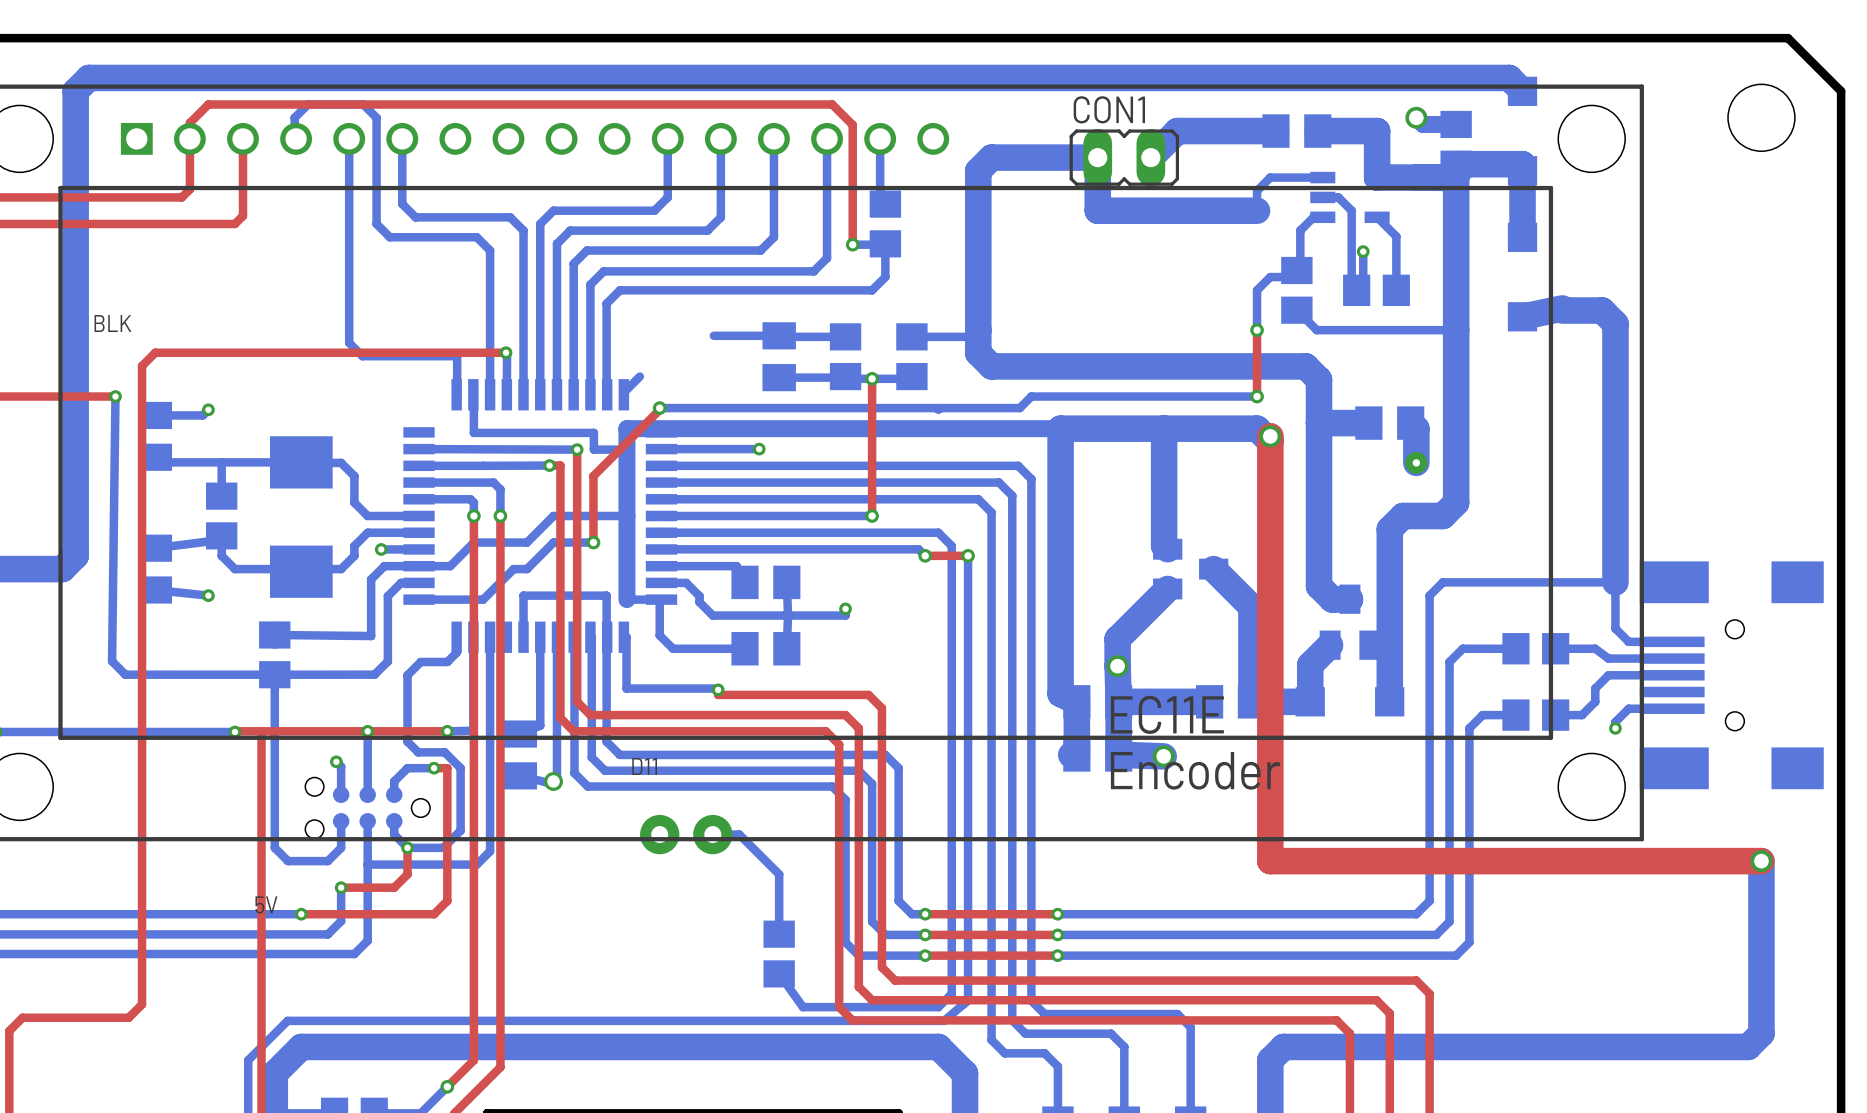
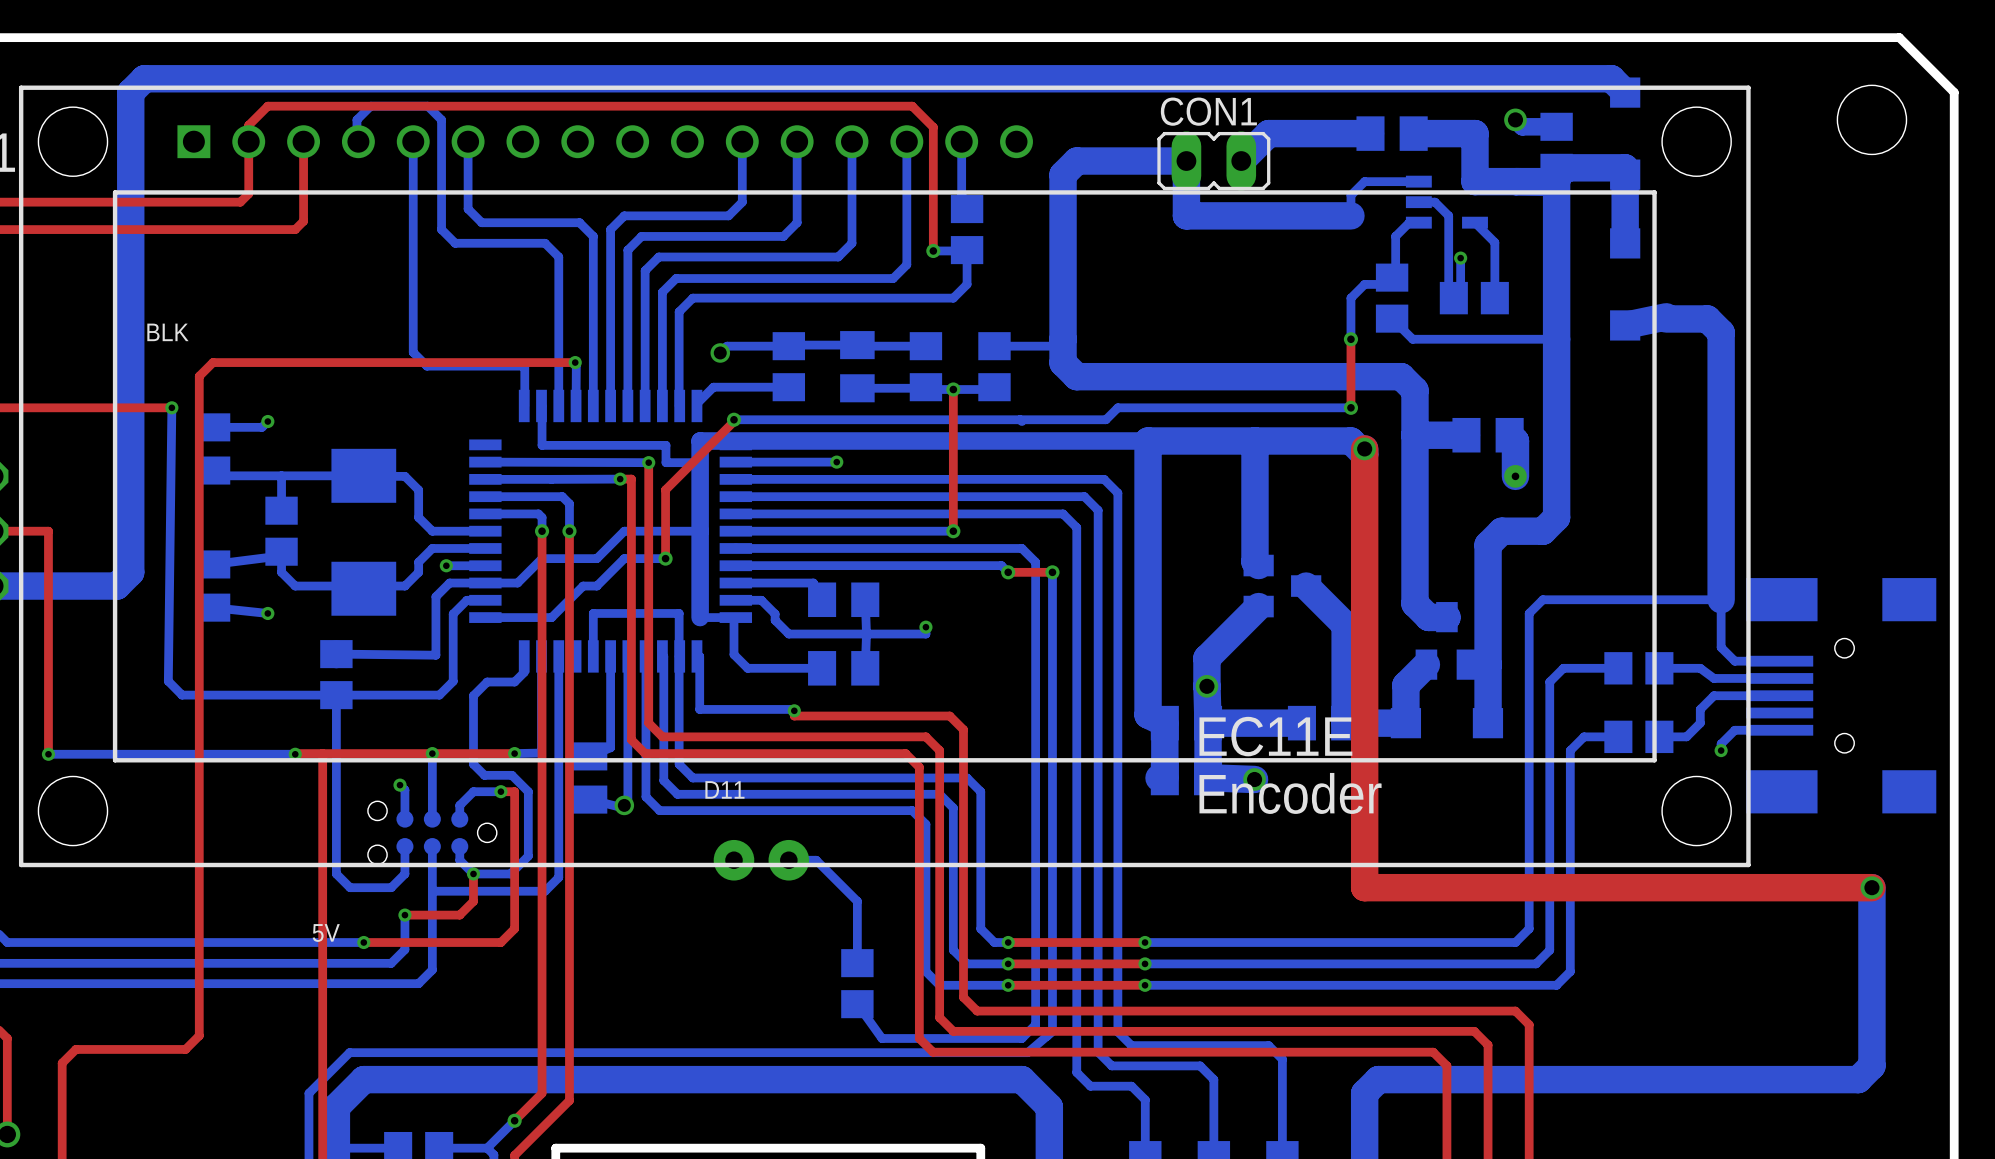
bottom track: none -> (789, 345) (727, 346) (720, 352)
via: none -> (720, 352)
part: none -> (788, 366)
bottom track: none -> (713, 387) (788, 387)

